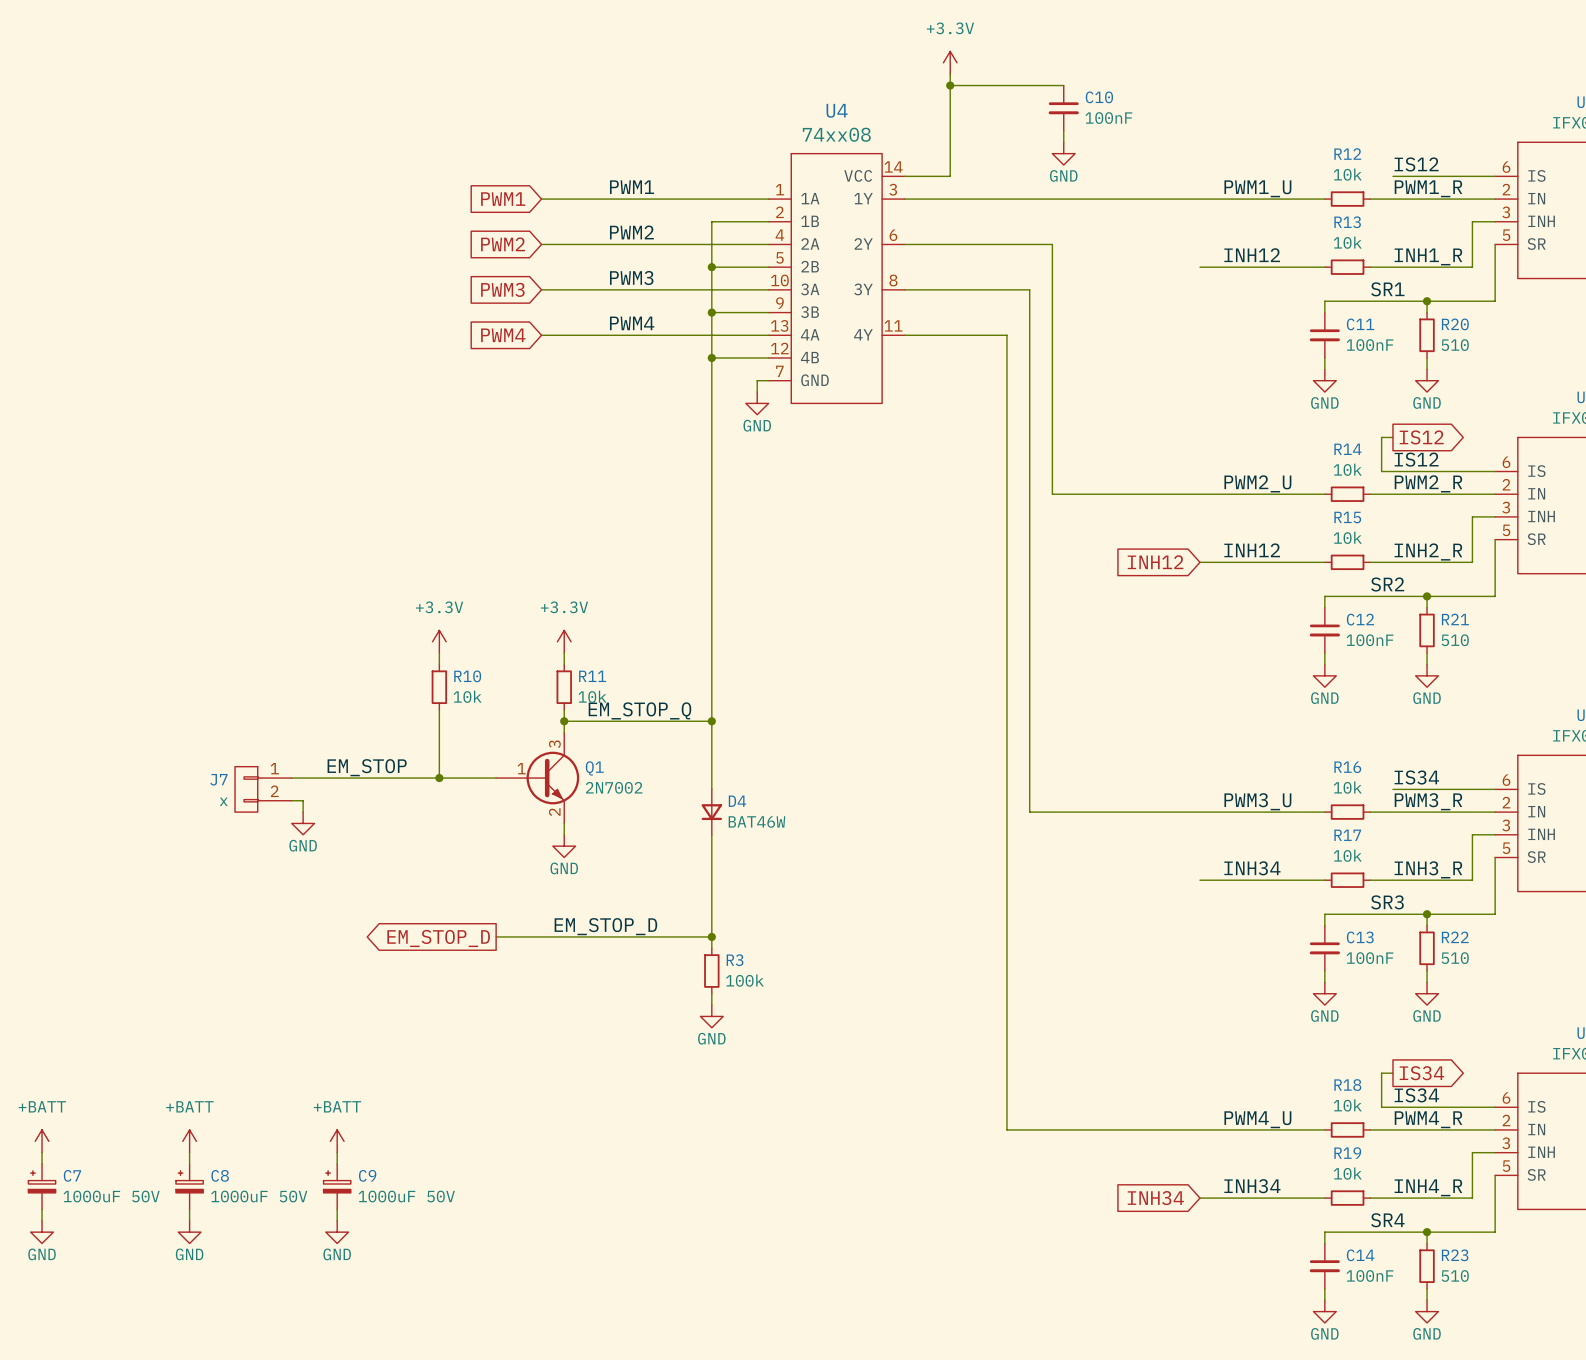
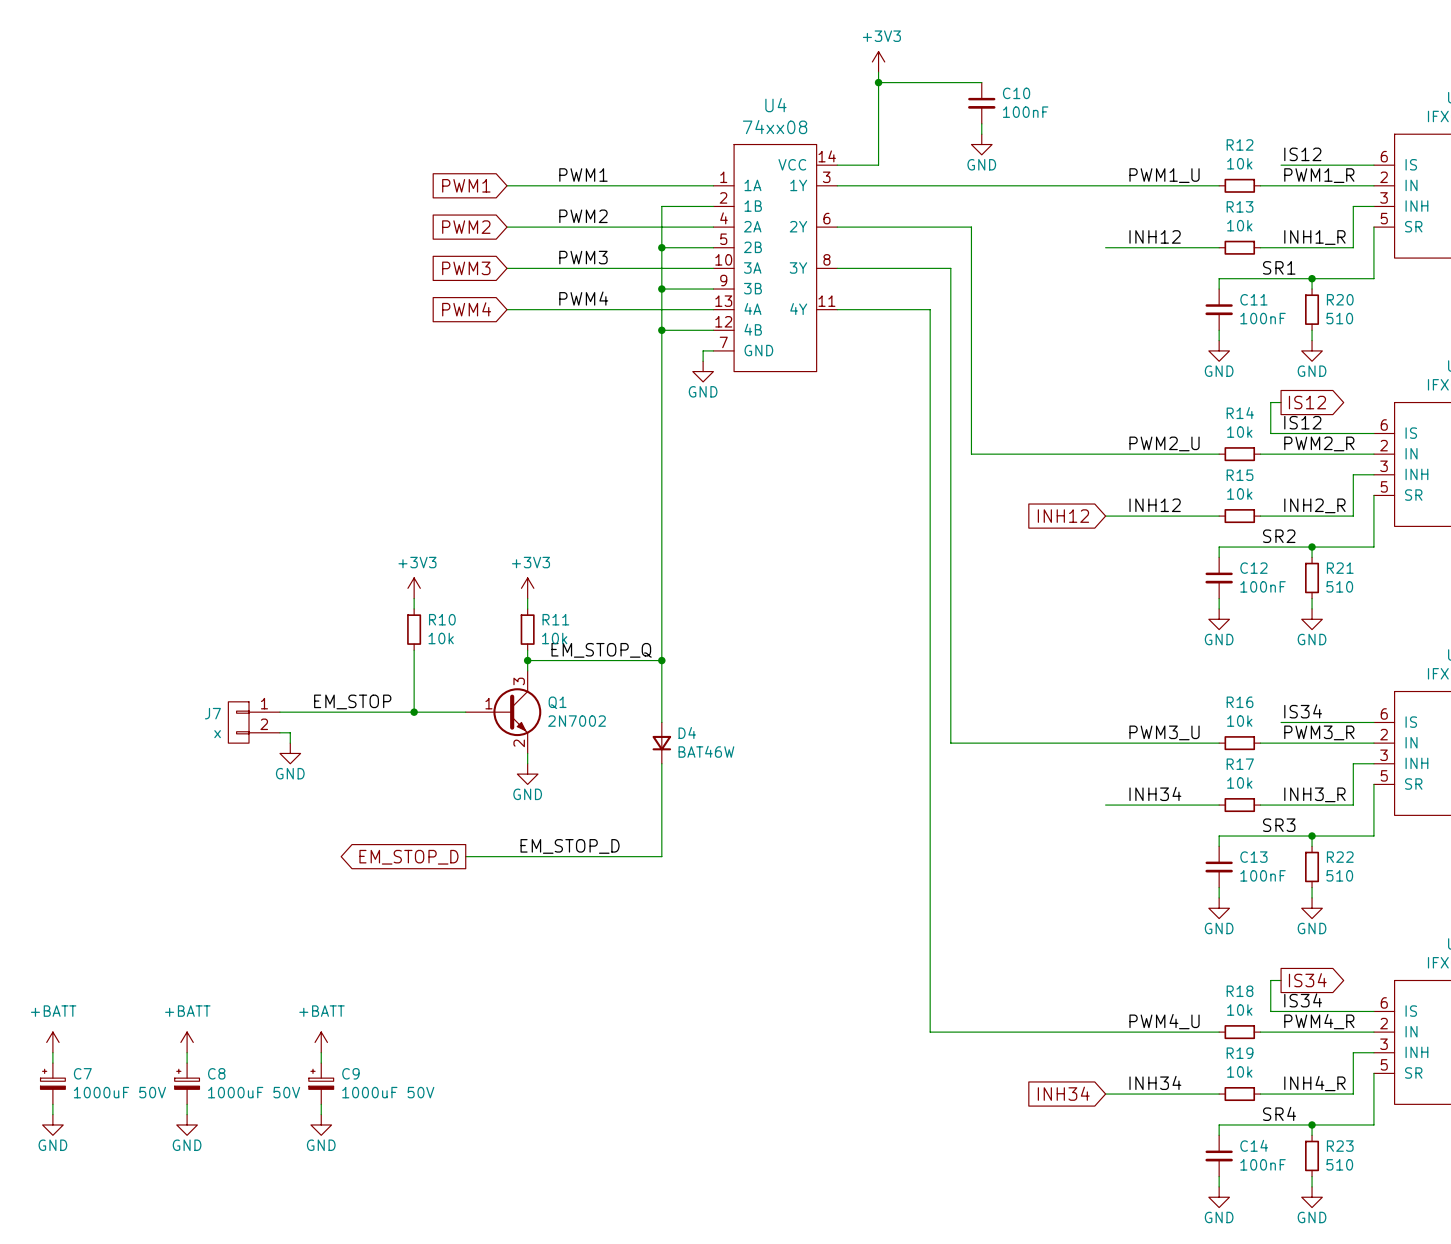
power symbol: +3.3V (950, 62) -> +3V3 (878, 61)
power symbol: +3.3V (439, 641) -> +3V3 (414, 588)
power symbol: +3.3V (564, 641) -> +3V3 (527, 588)
wire: (711, 936) (711, 948) -> none
junction: (711, 936) -> none
R3: 100k (711, 971) -> none
wire: (711, 993) (711, 1005) -> none
power symbol: GND (711, 1016) -> none

